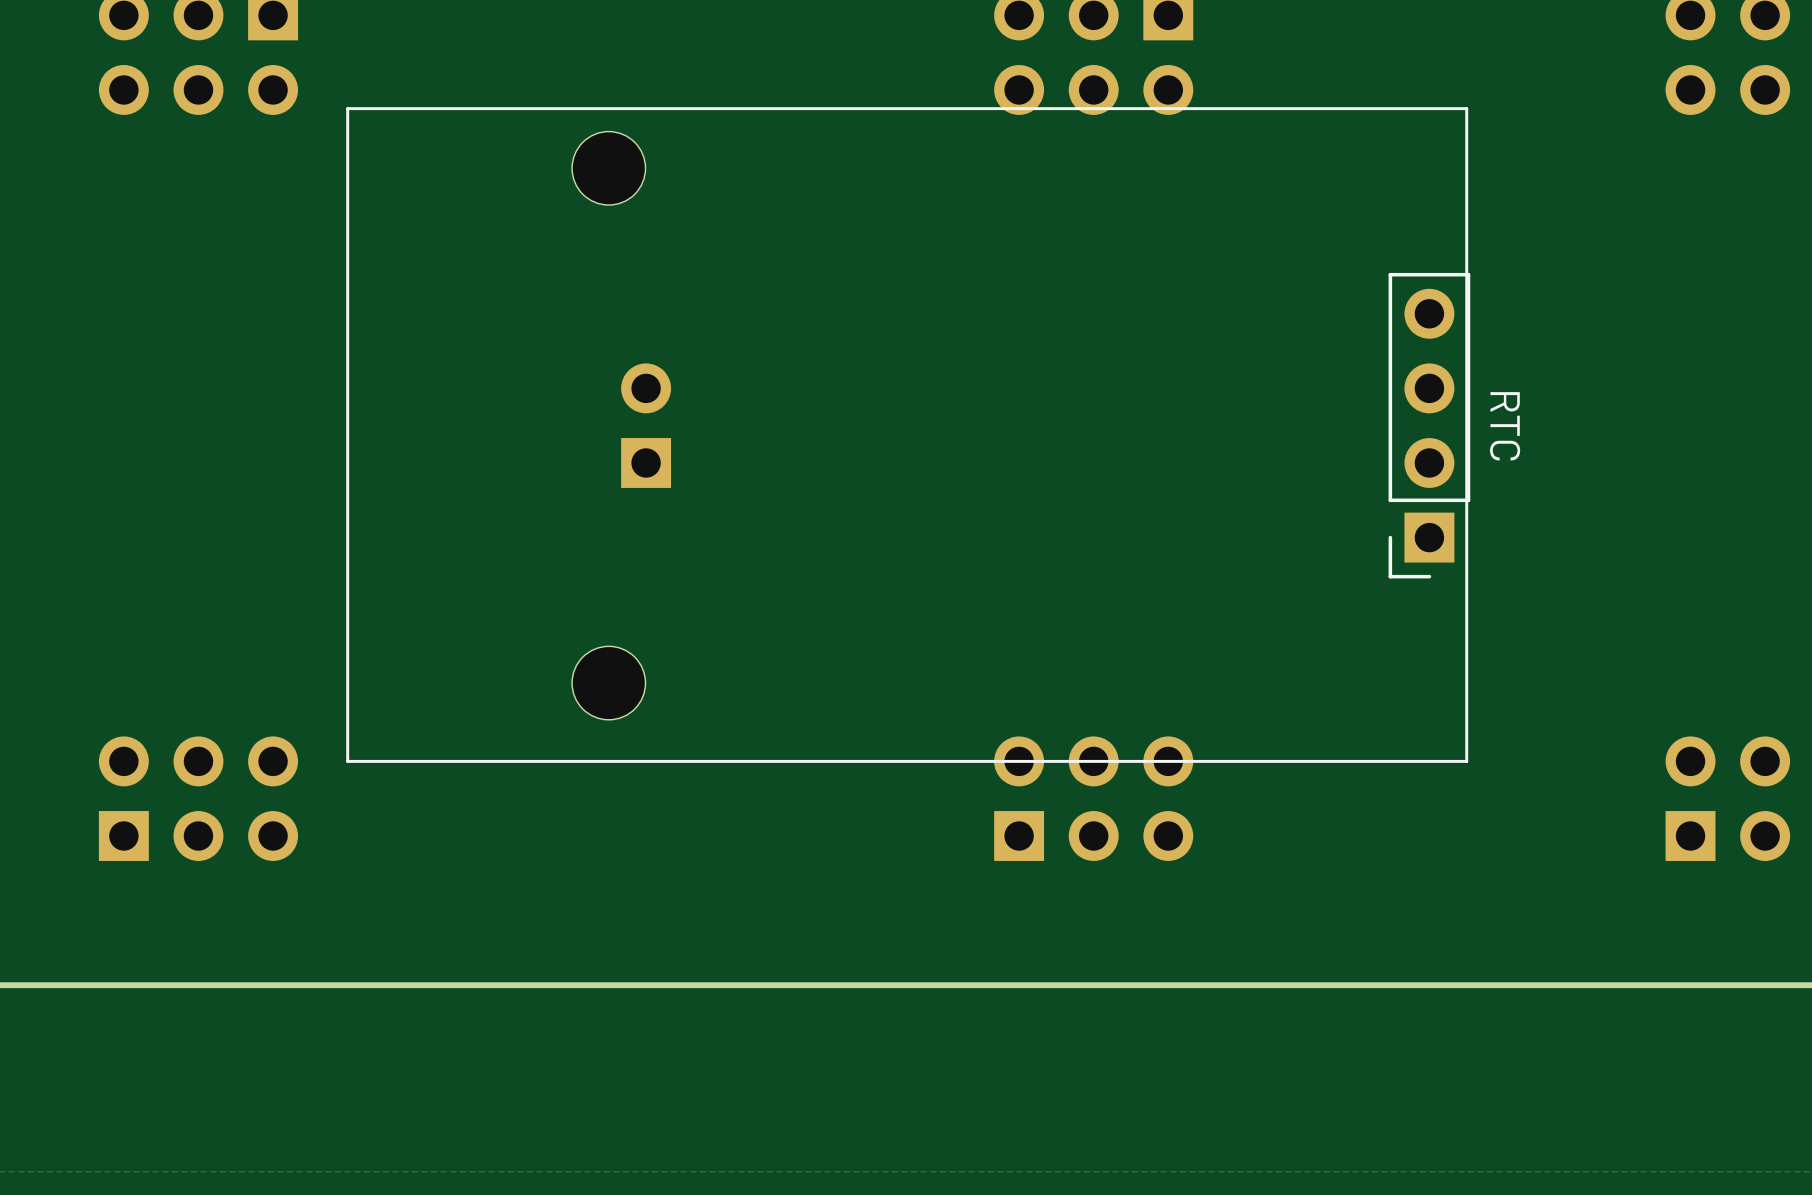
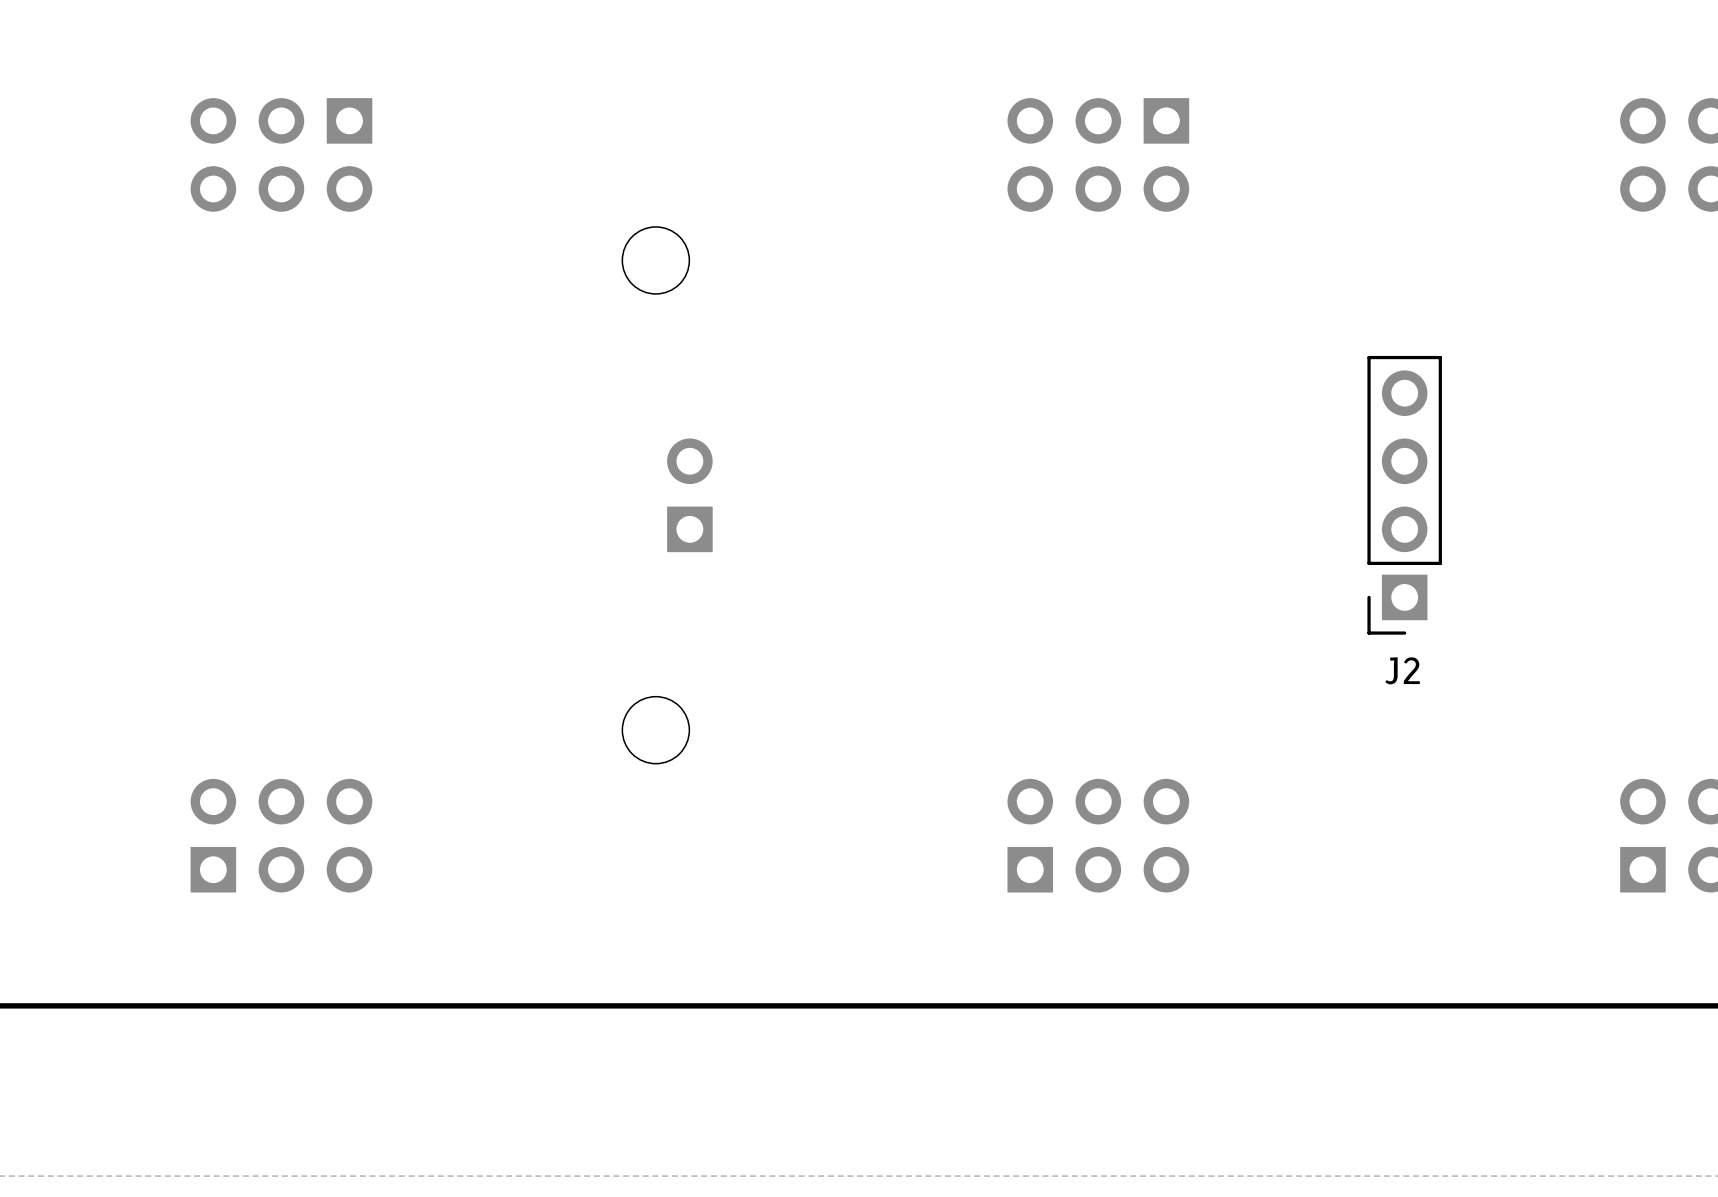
line: (1466, 108) (347, 108) (347, 761) (1466, 761) (1466, 108) -> none
J2 value: RTC (1505, 426) -> none
J2 name: none -> J2 (1402, 670)

